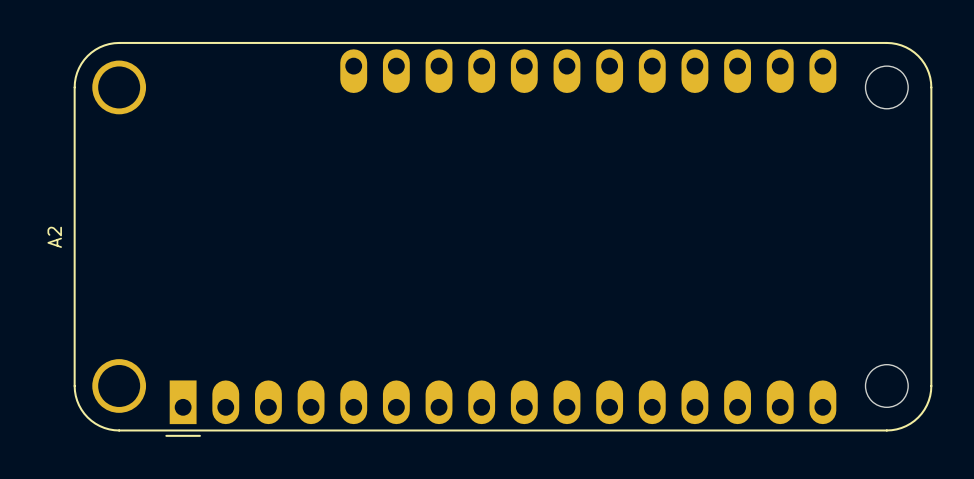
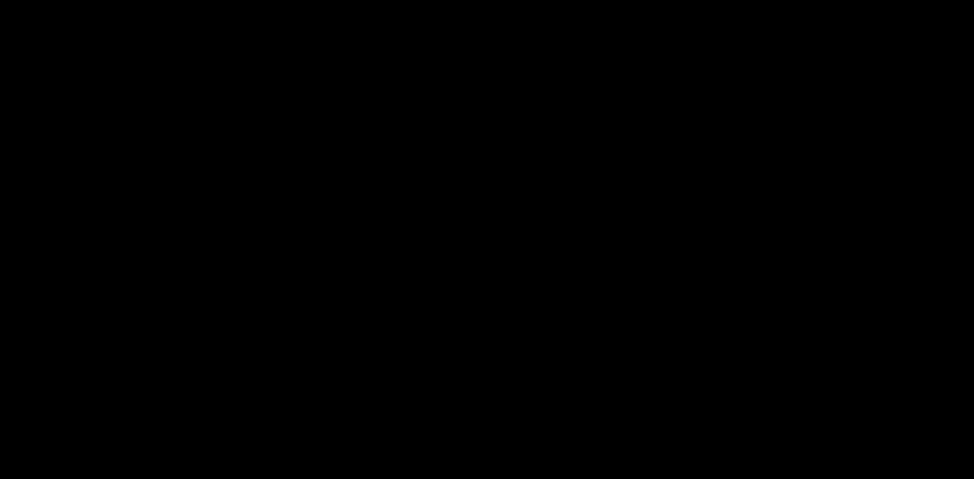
A2: (503, 239) -> none

